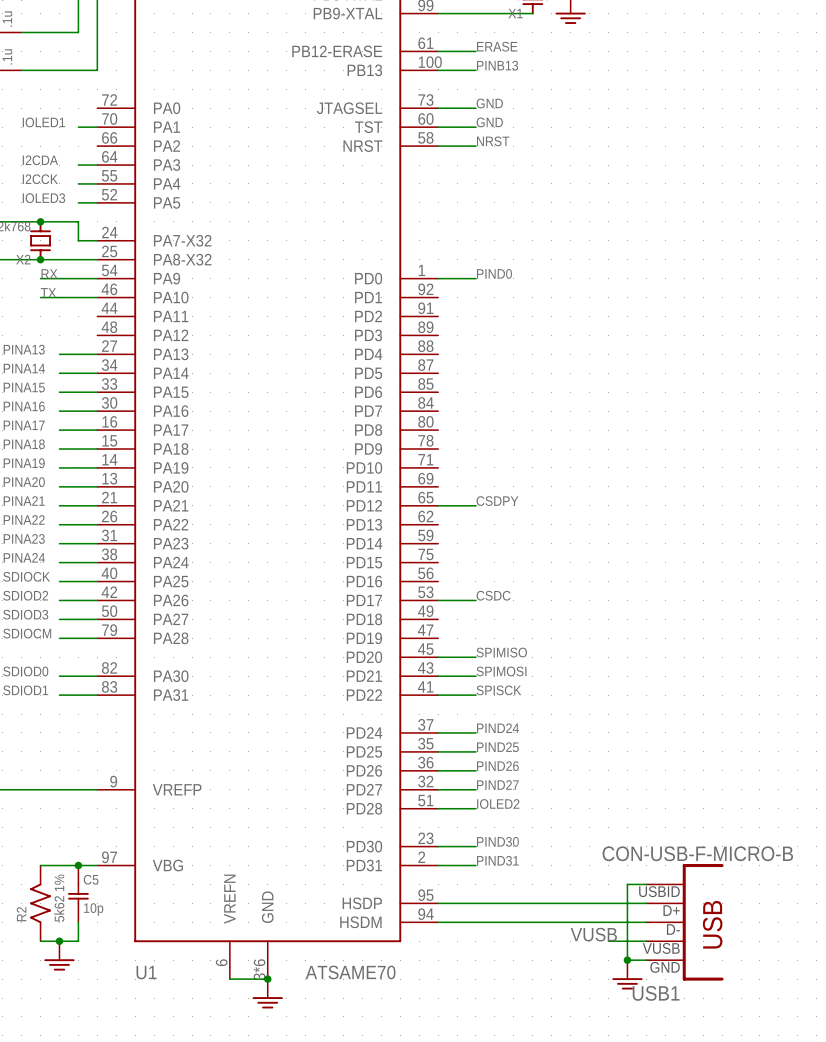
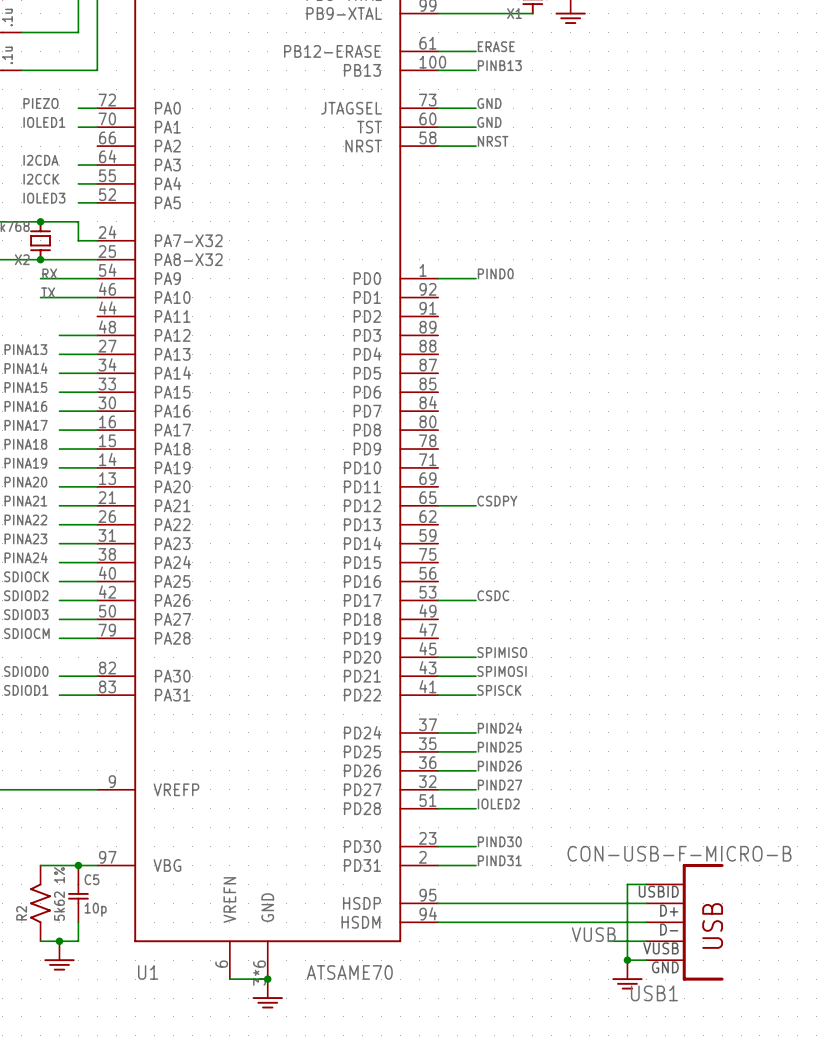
label: none -> PIEZO (40, 103)
wire: none -> (78, 108) (97, 108)
wire: none -> (59, 335) (97, 335)

